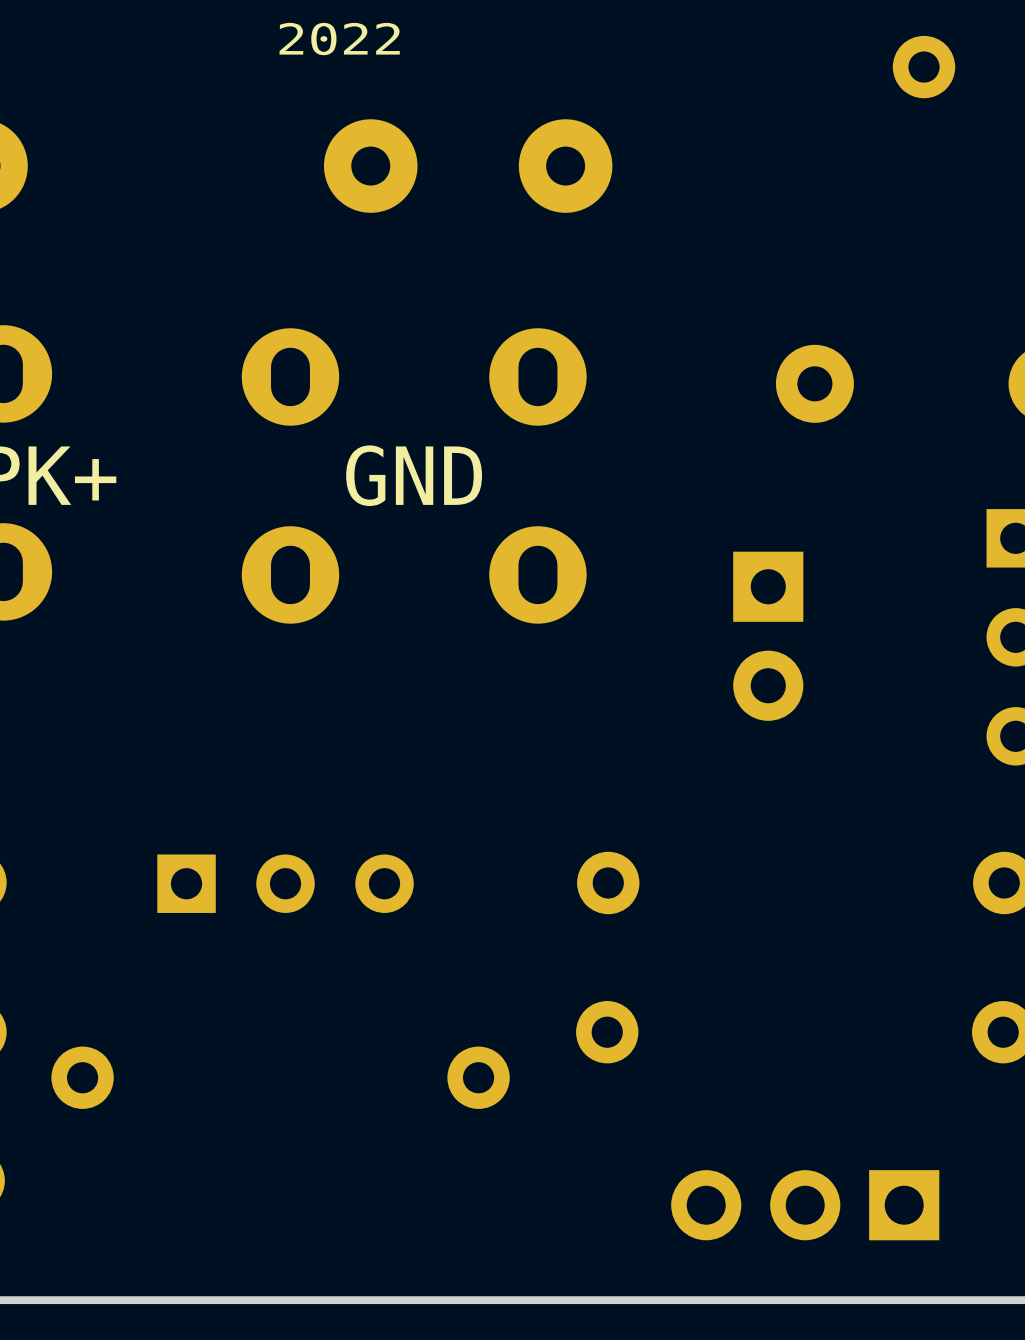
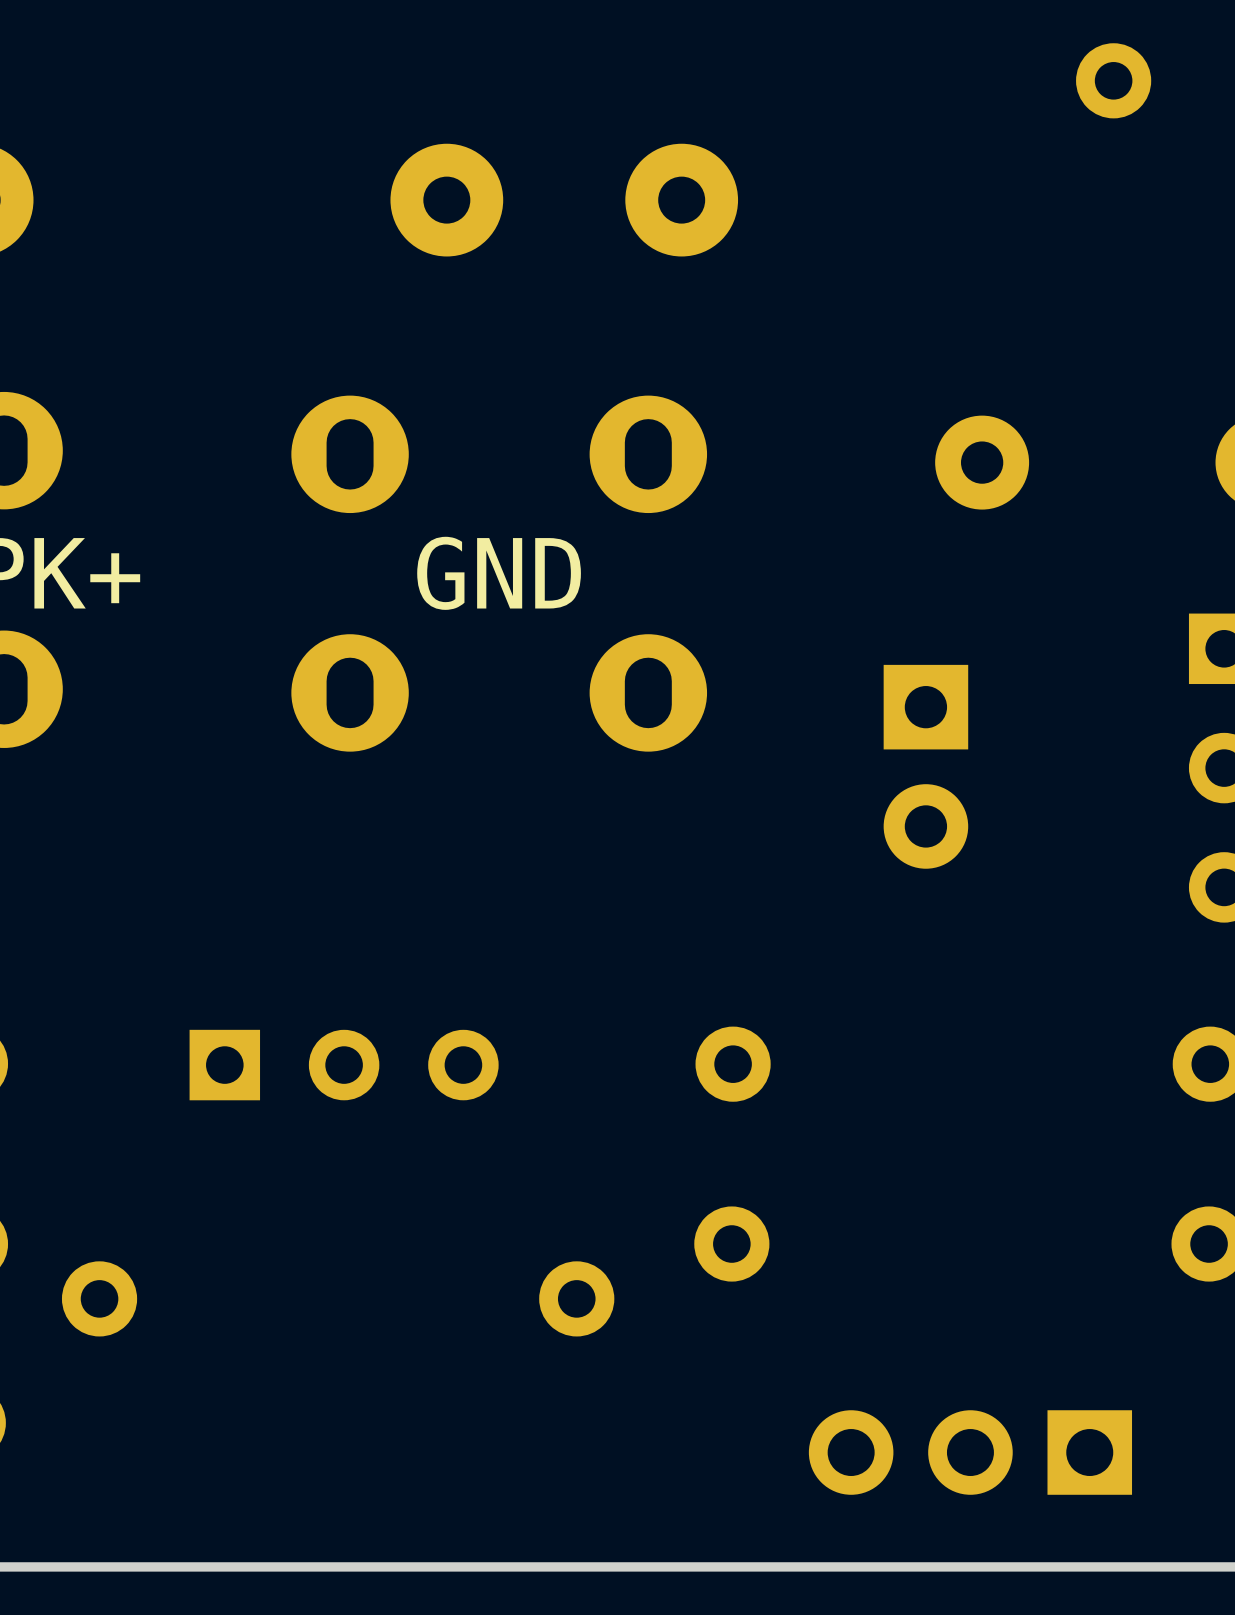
text: 2022 (339, 39) -> none

